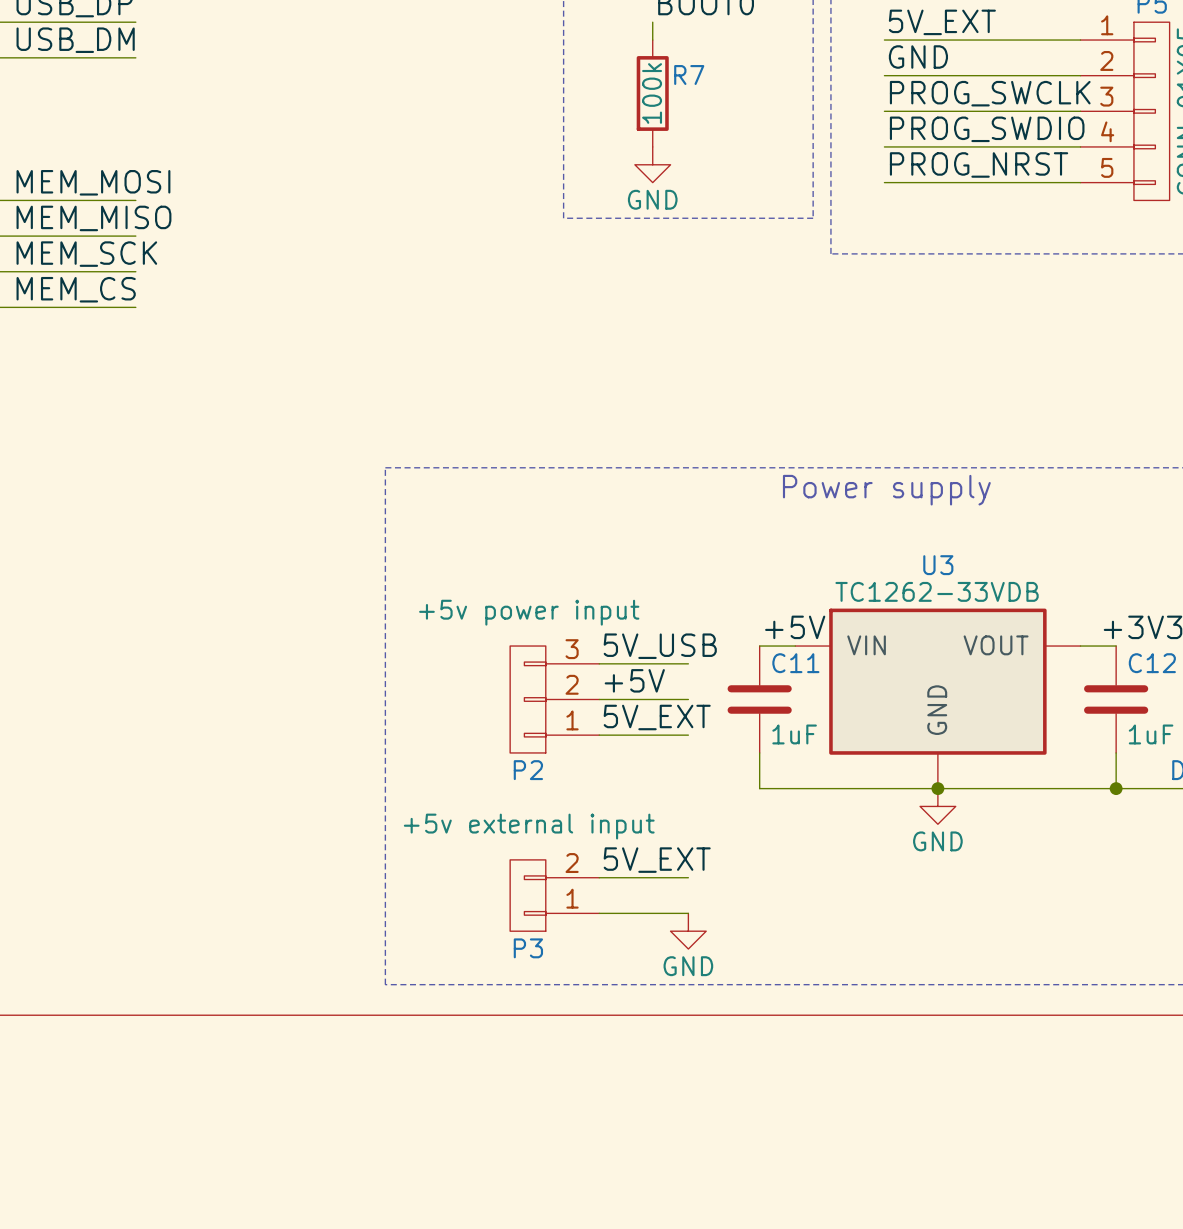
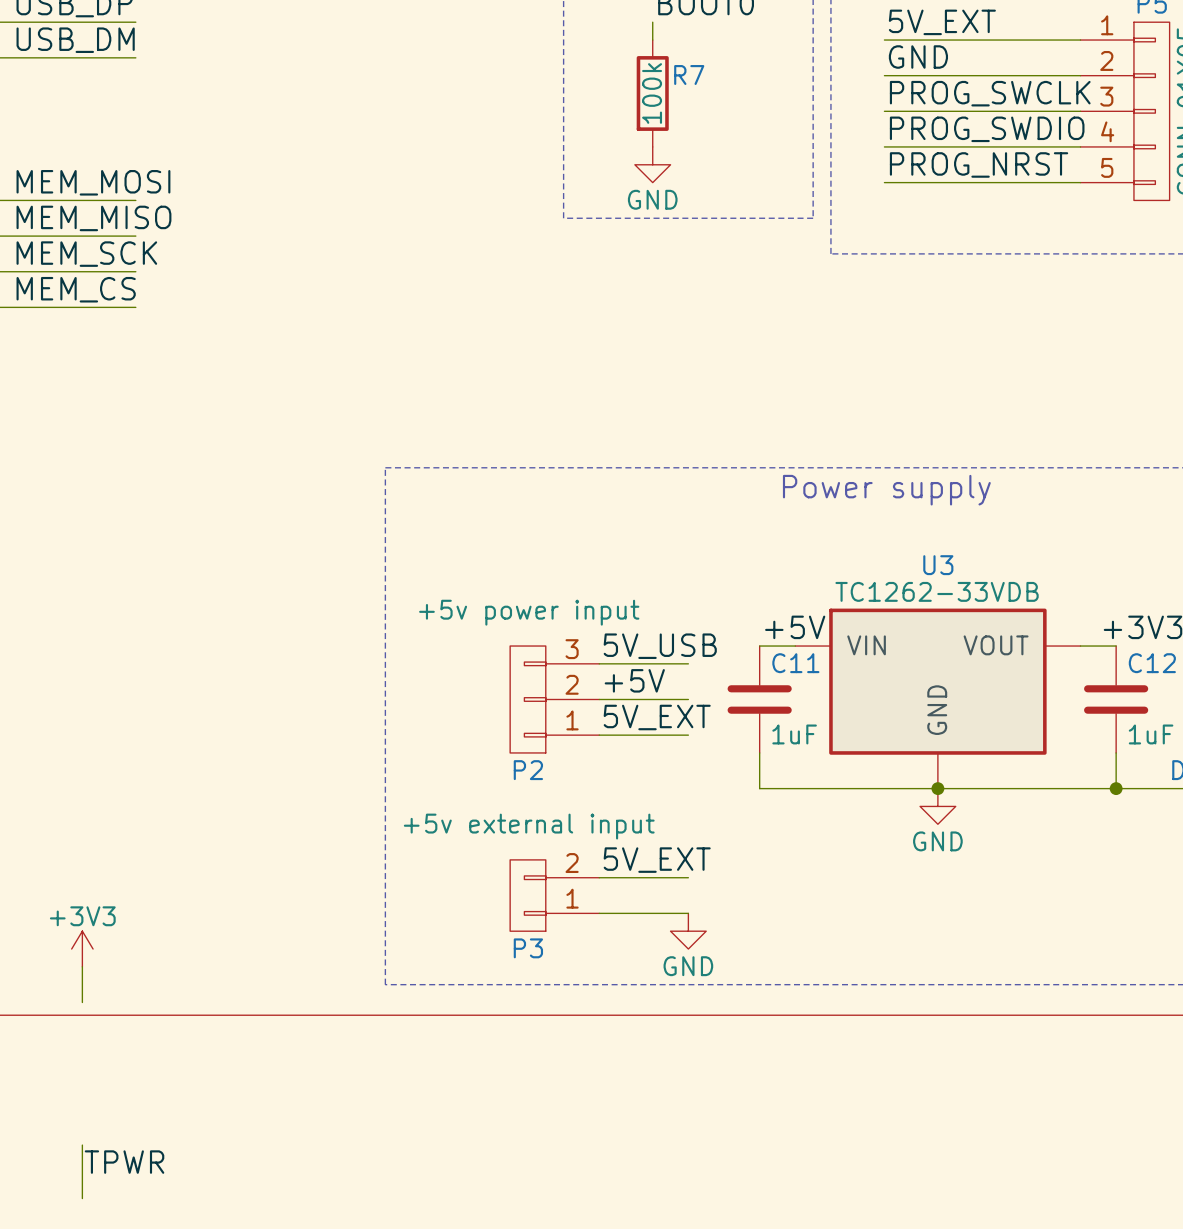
power symbol: none -> +3V3 (82, 949)
wire: none -> (82, 966) (82, 1002)
wire: none -> (82, 1145) (82, 1198)
label: none -> TPWR (124, 1162)

